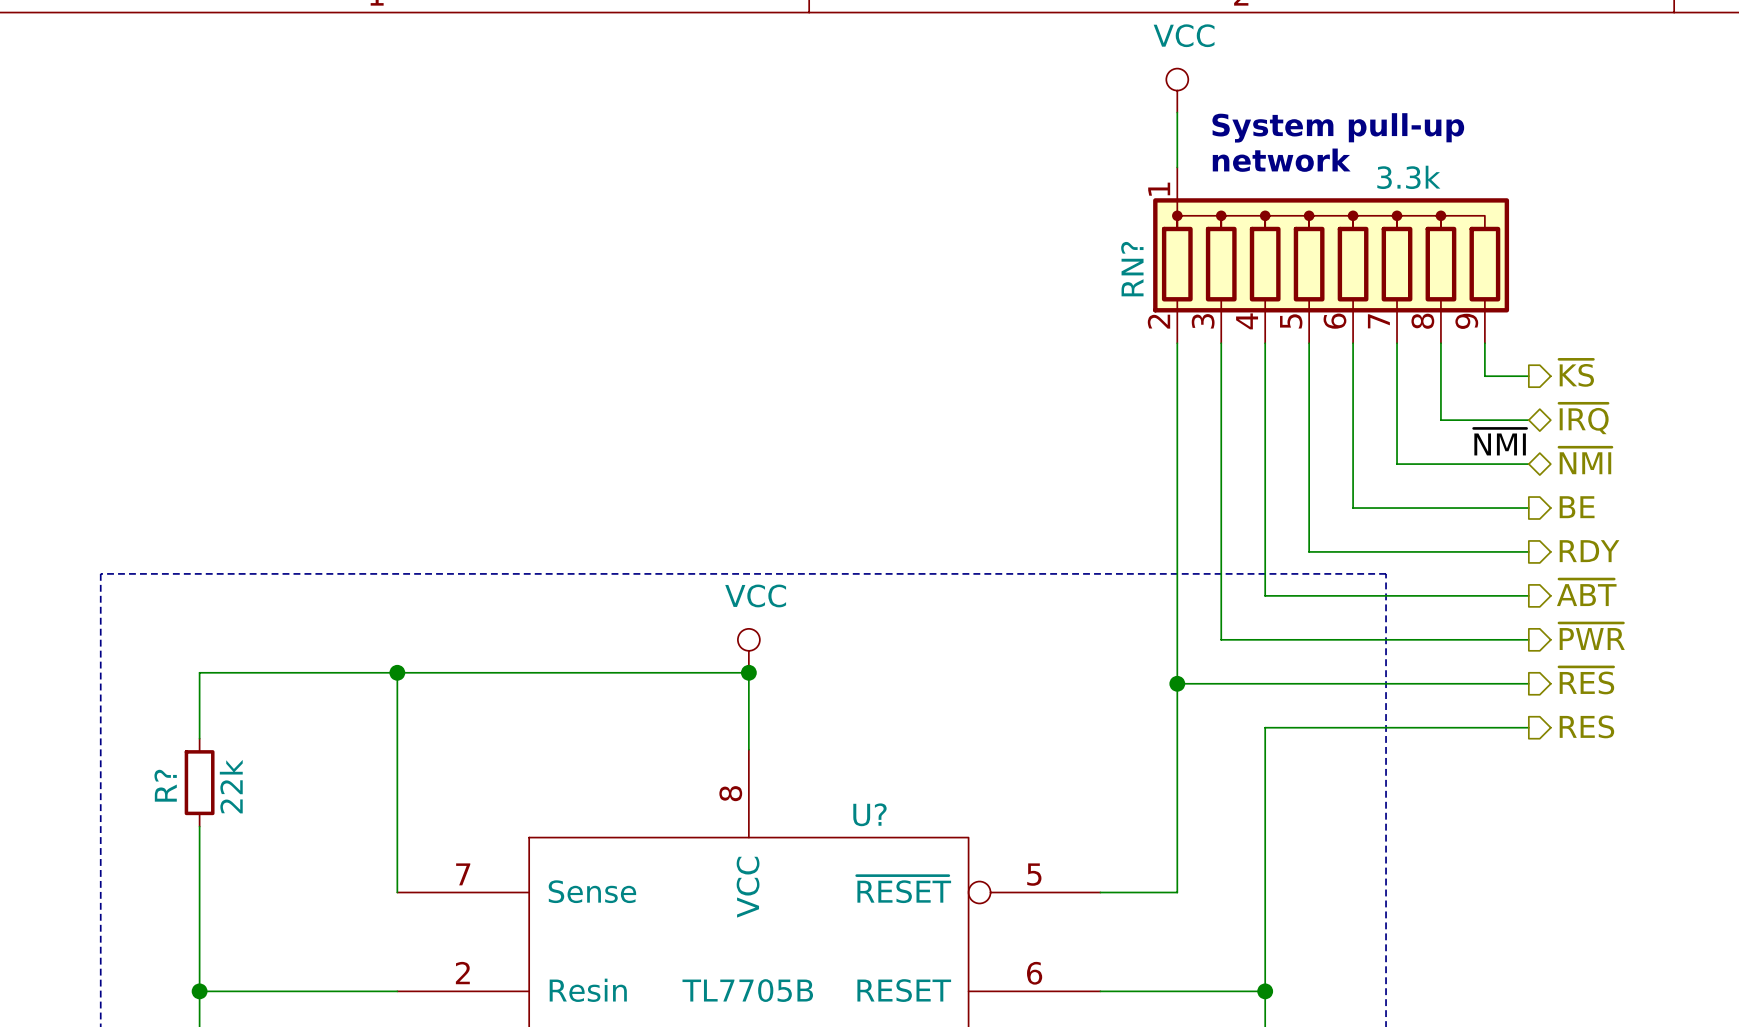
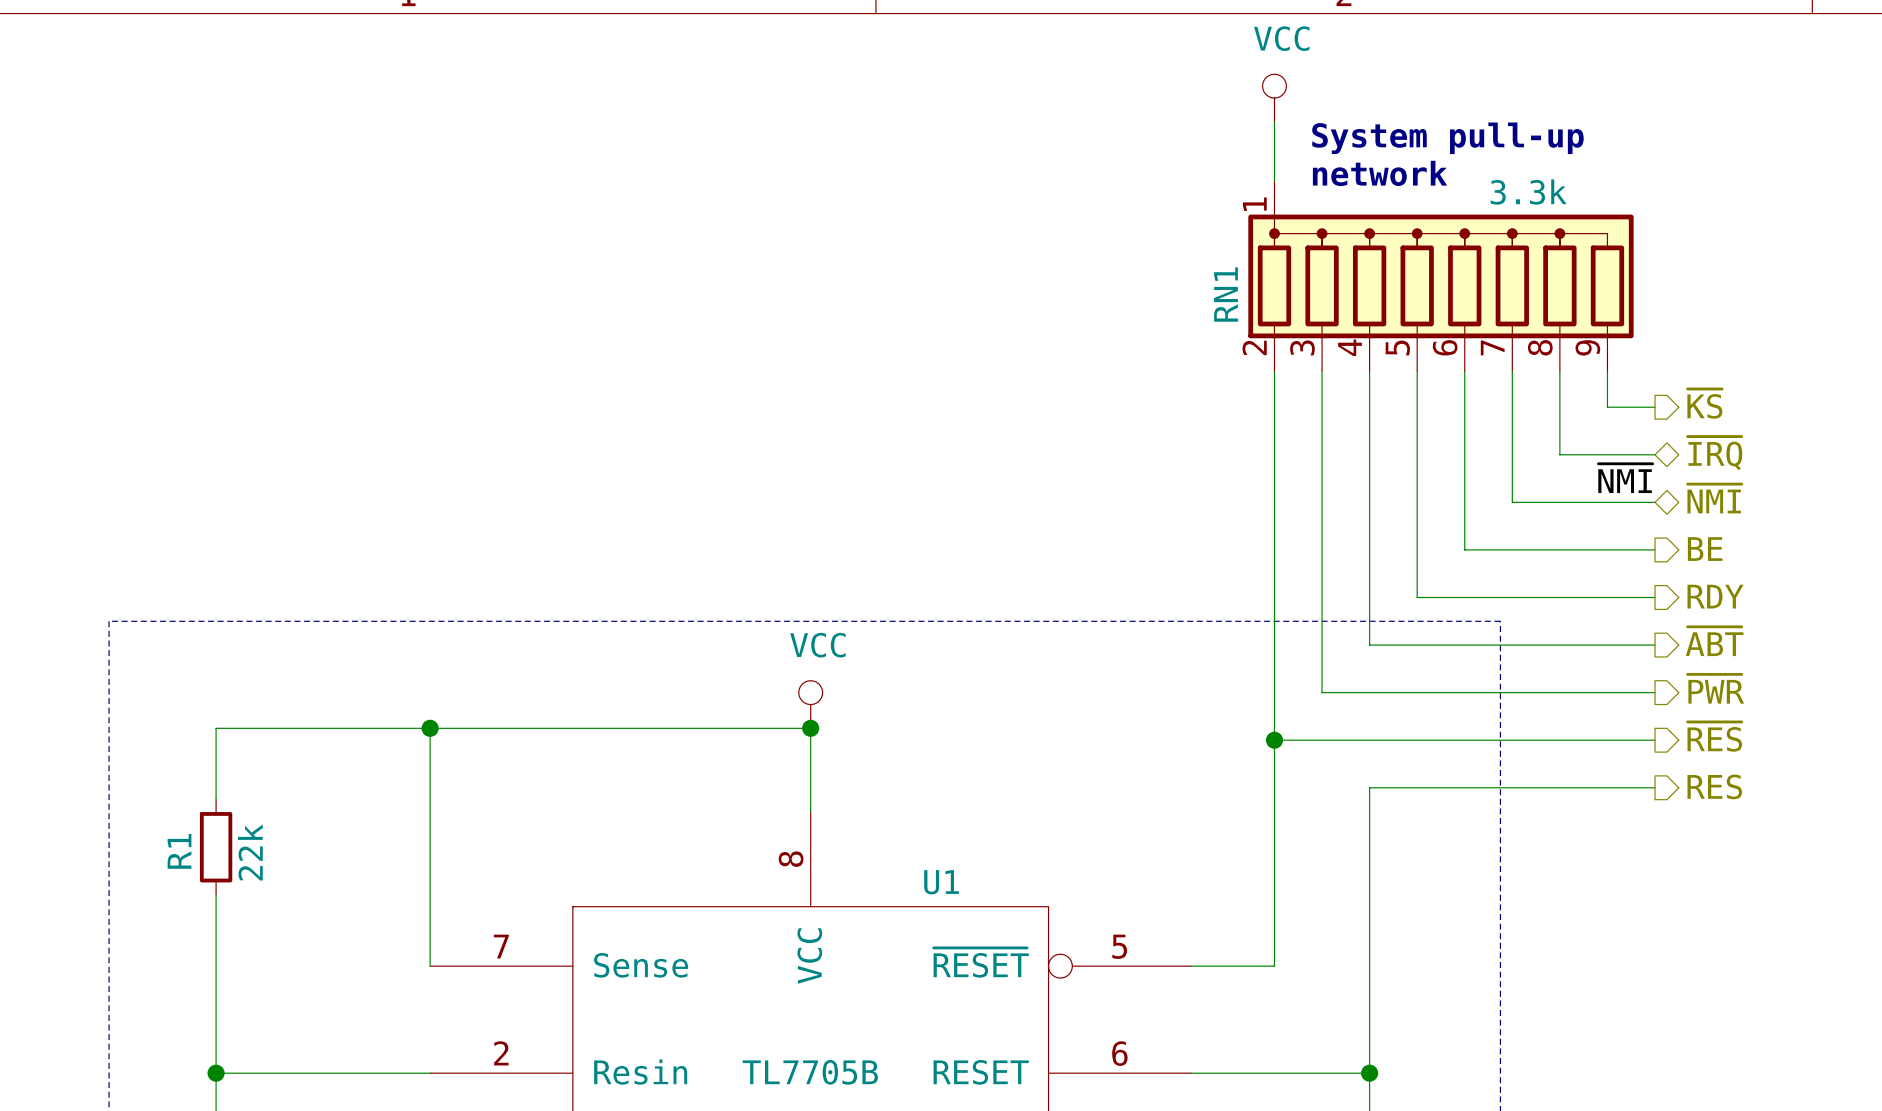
RN? name: RN? (1132, 269) -> RN1 (1226, 294)
R? name: R? (165, 785) -> R1 (179, 851)
U? name: U? (869, 814) -> U1 (941, 882)

